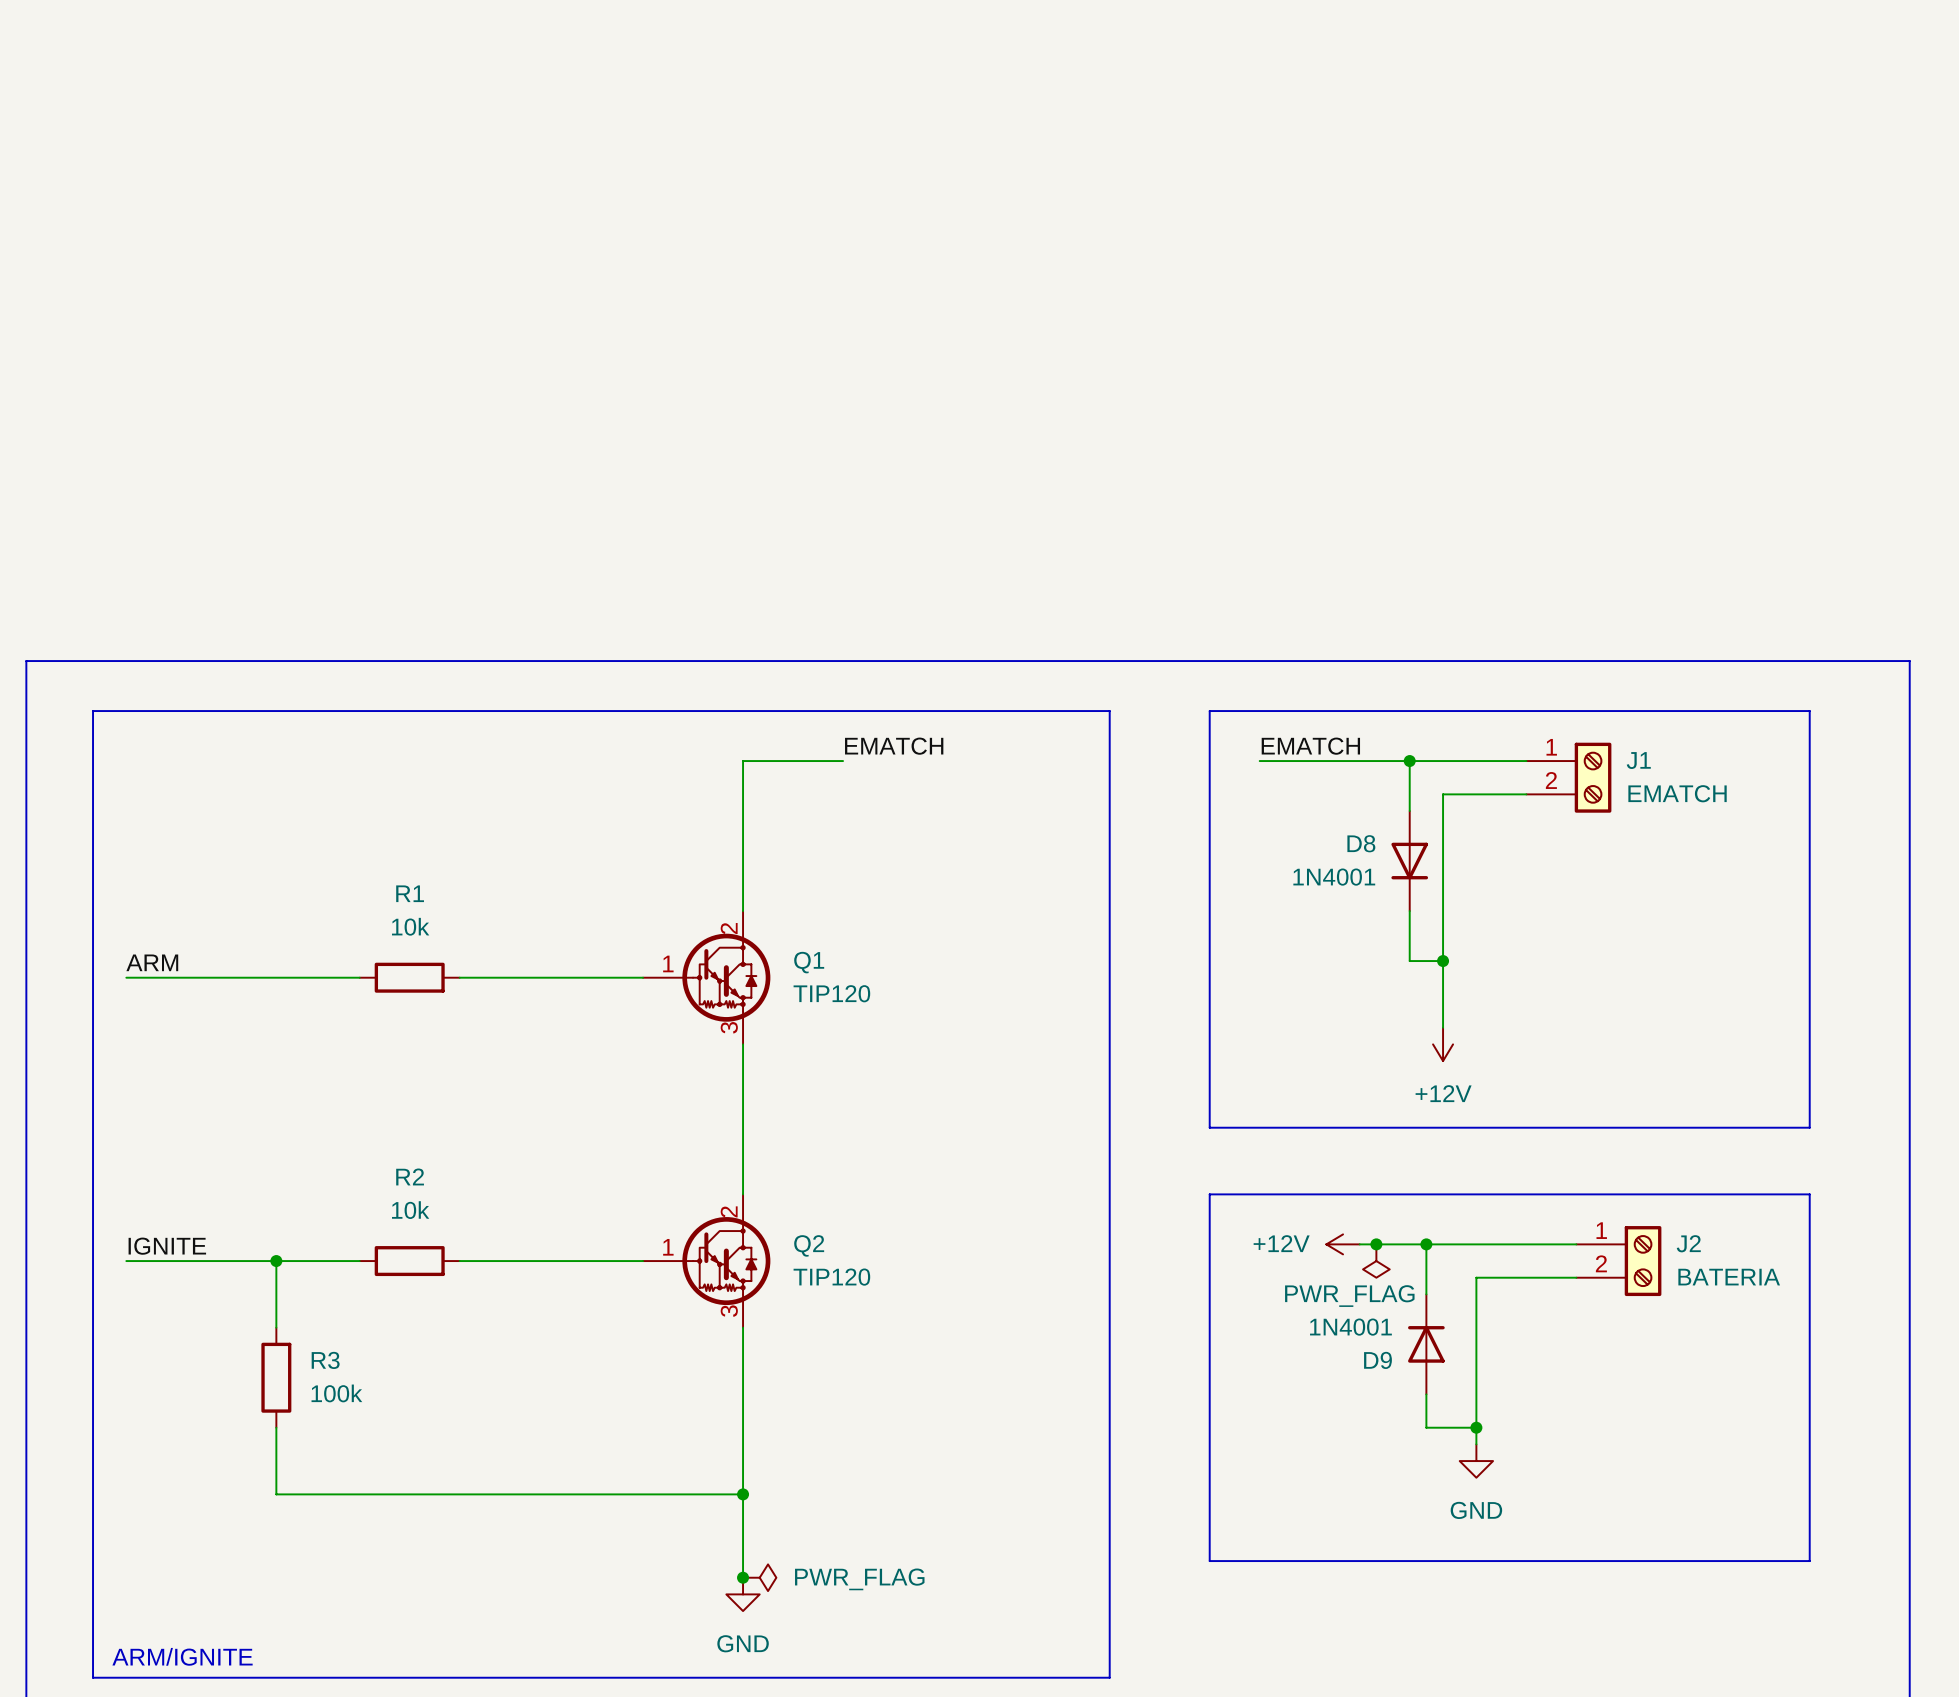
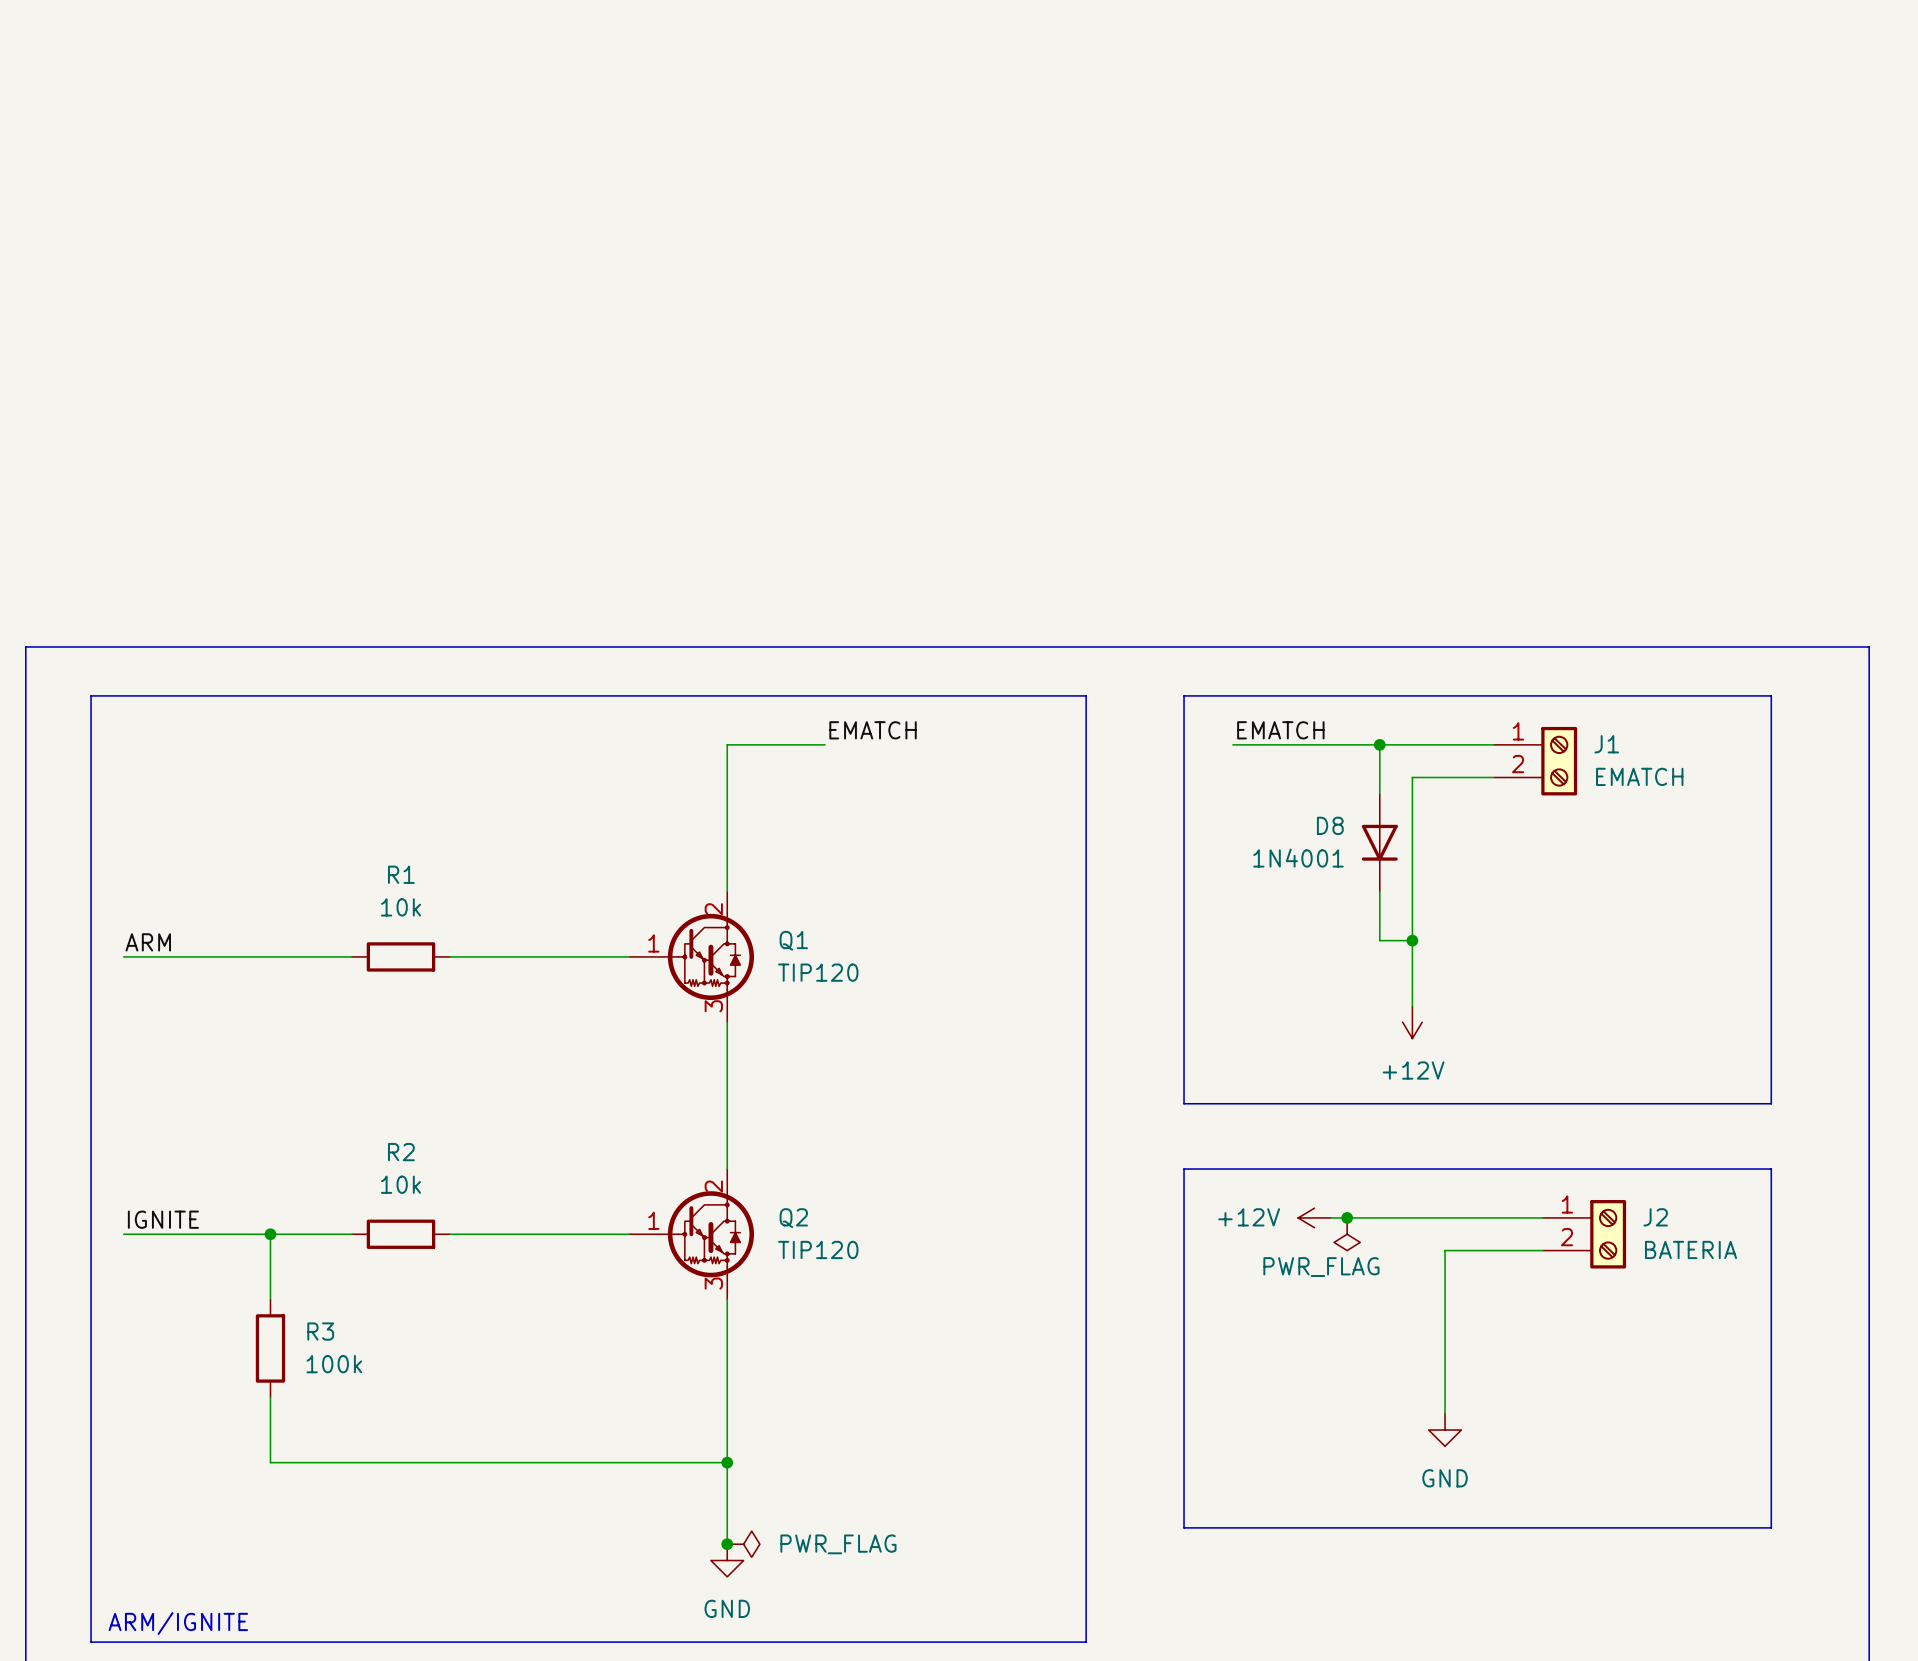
wire: (1426, 1244) (1426, 1294) -> none
junction: (1426, 1244) -> none
D9: 1N4001 (1426, 1344) -> none
wire: (1426, 1394) (1426, 1427) (1476, 1427) -> none
junction: (1476, 1427) -> none

